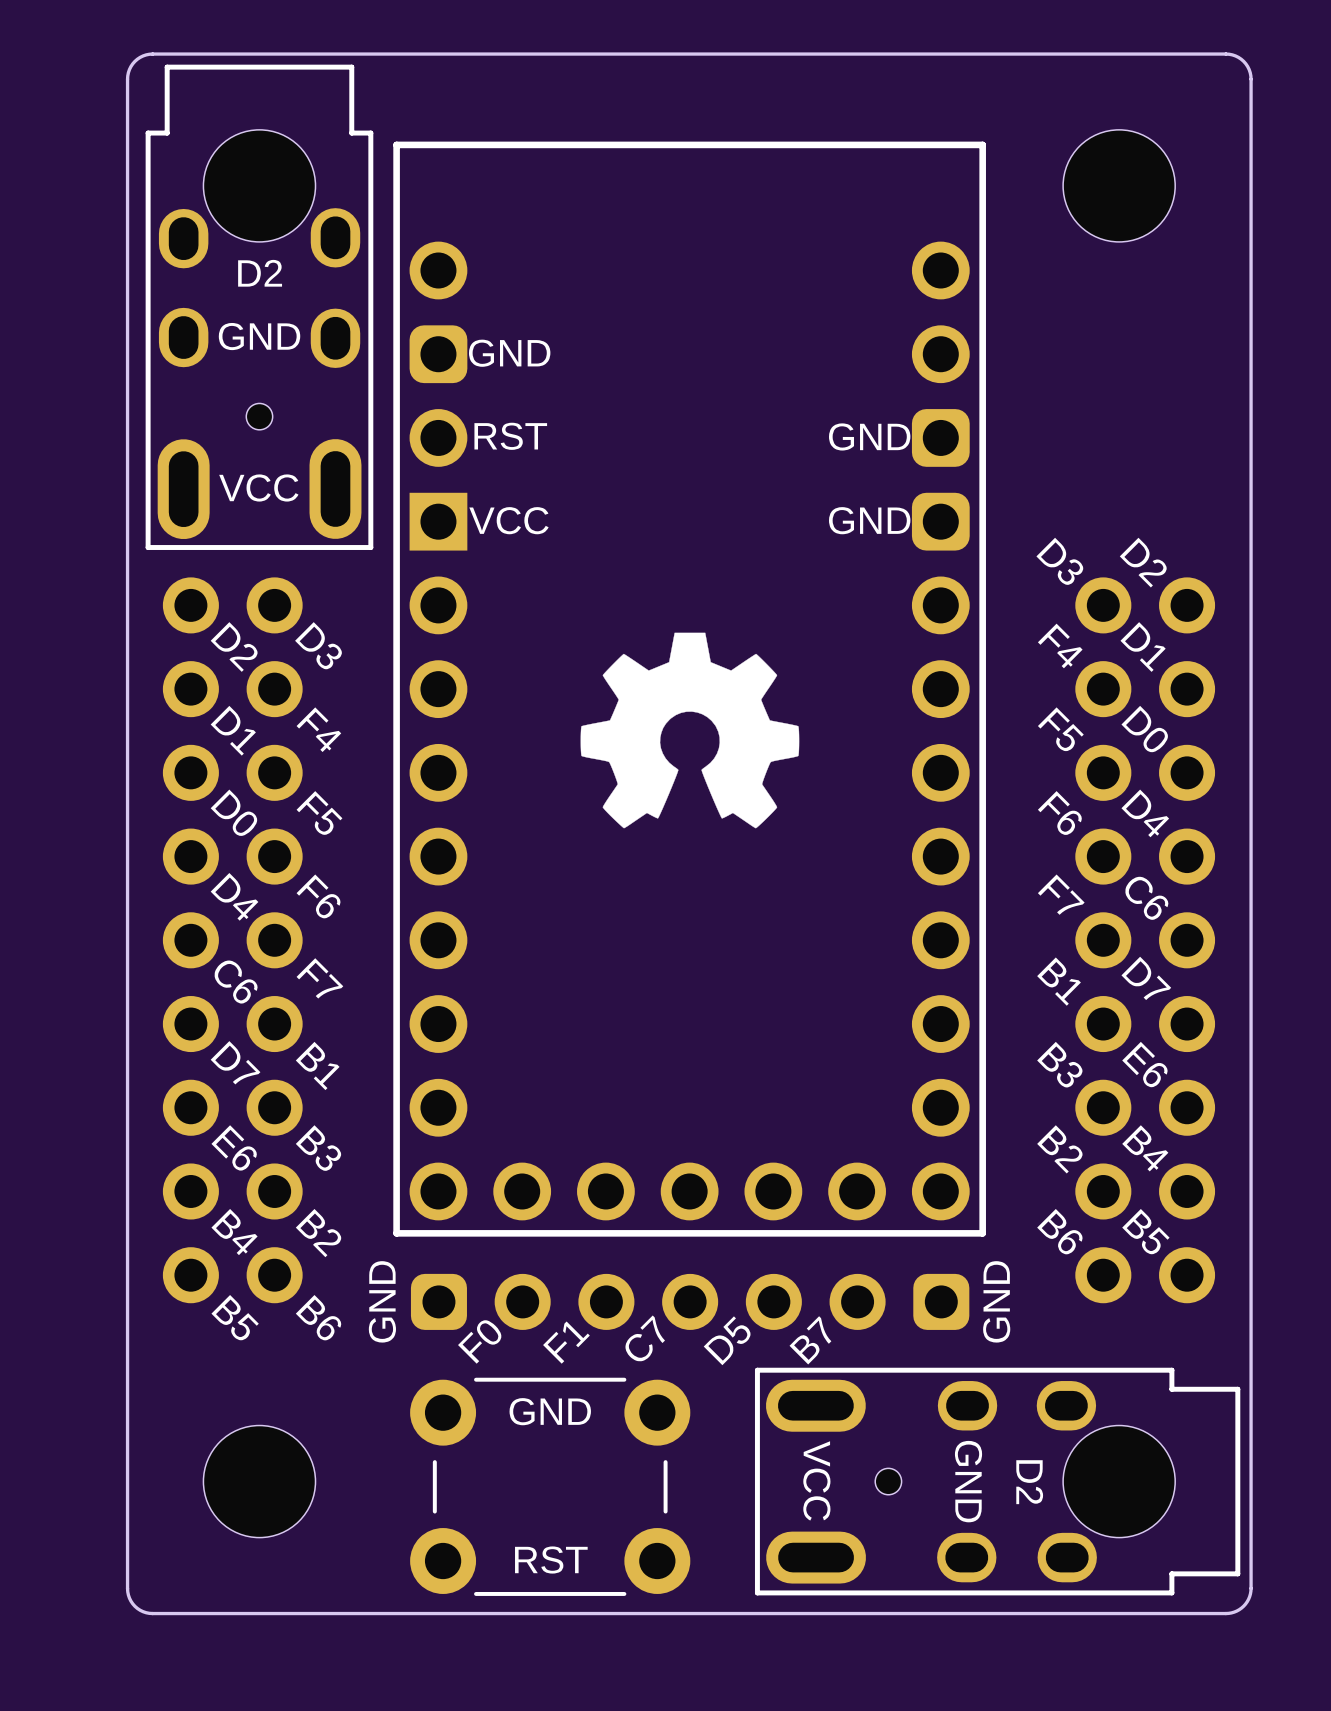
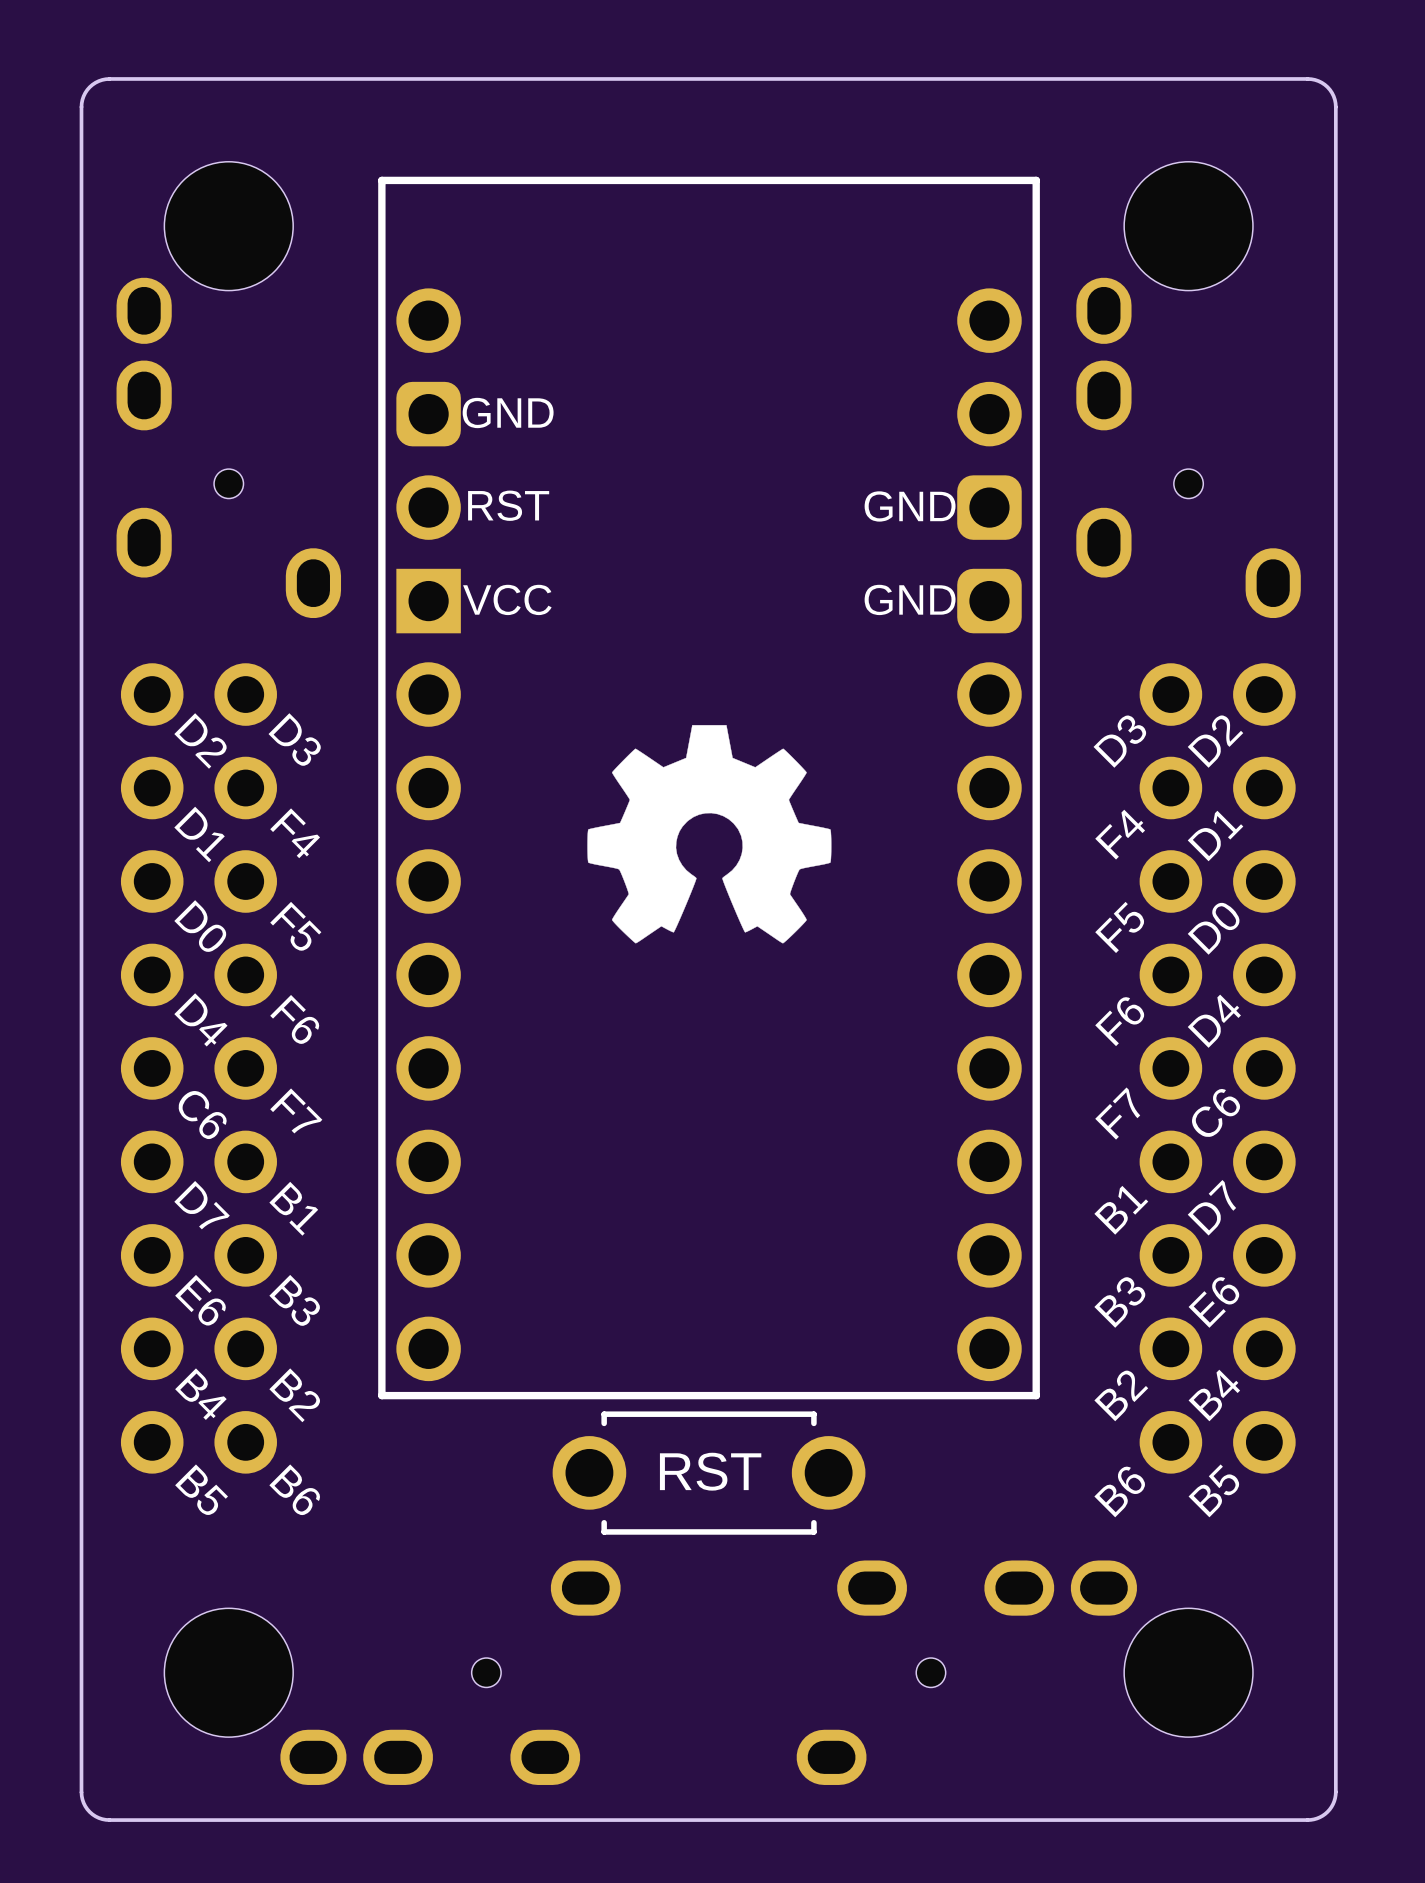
part footprint: [145, 64, 374, 550] -> [116, 161, 342, 619]
part footprint: [393, 141, 986, 1237] -> [378, 176, 1040, 1400]
part: (1119, 185) -> none
part: none -> (1188, 389)
part side: top (1145, 940) -> bottom (1217, 1068)
part footprint: [410, 1273, 970, 1330] -> [552, 1411, 866, 1535]
part footprint: [754, 1367, 1241, 1596] -> [796, 1560, 1253, 1785]
part: (259, 1481) -> none
part: none -> (392, 1672)
part: (550, 1486) -> none

